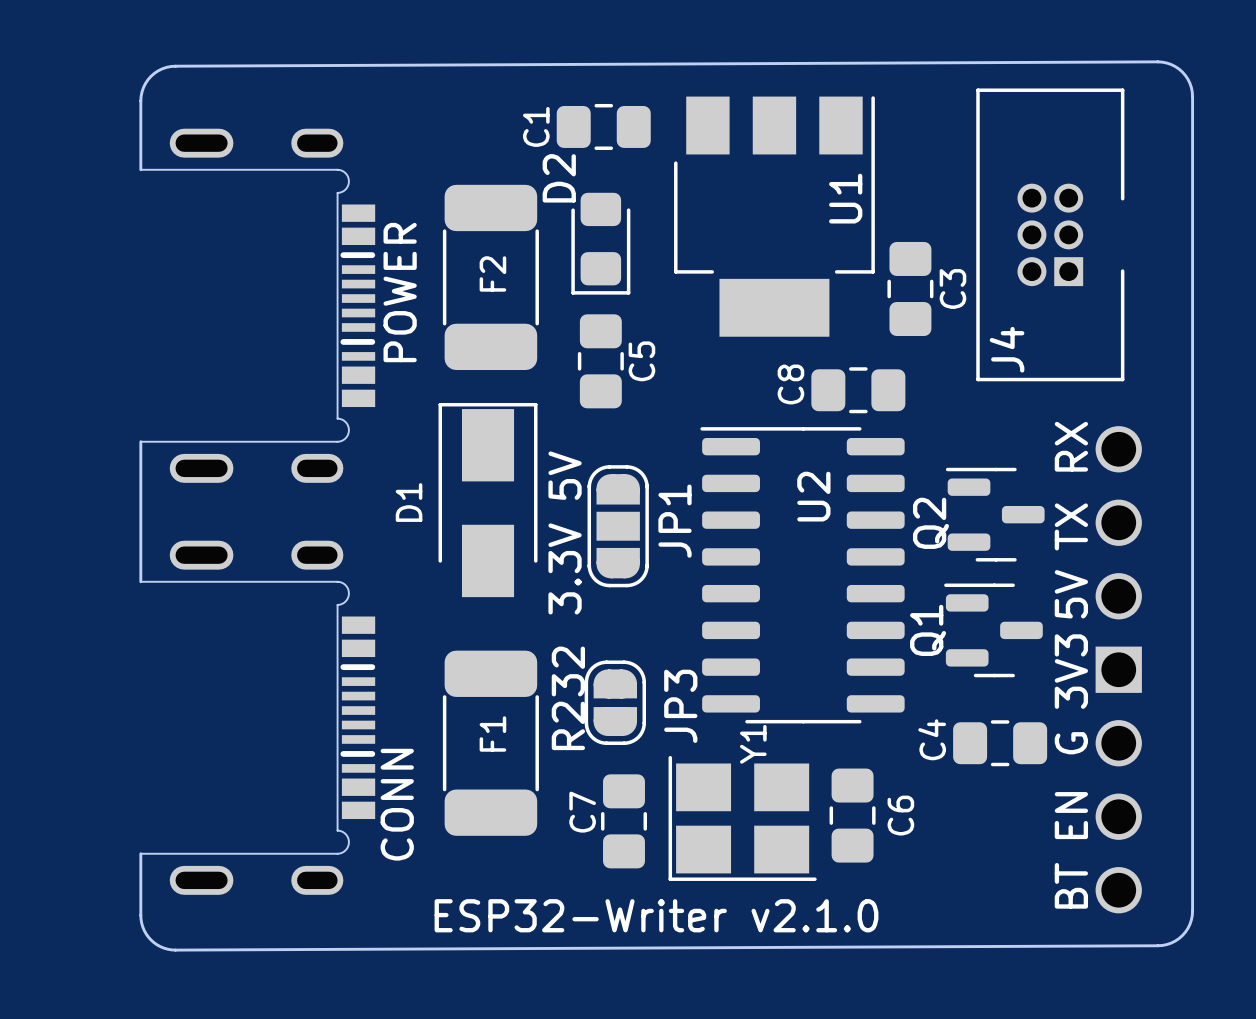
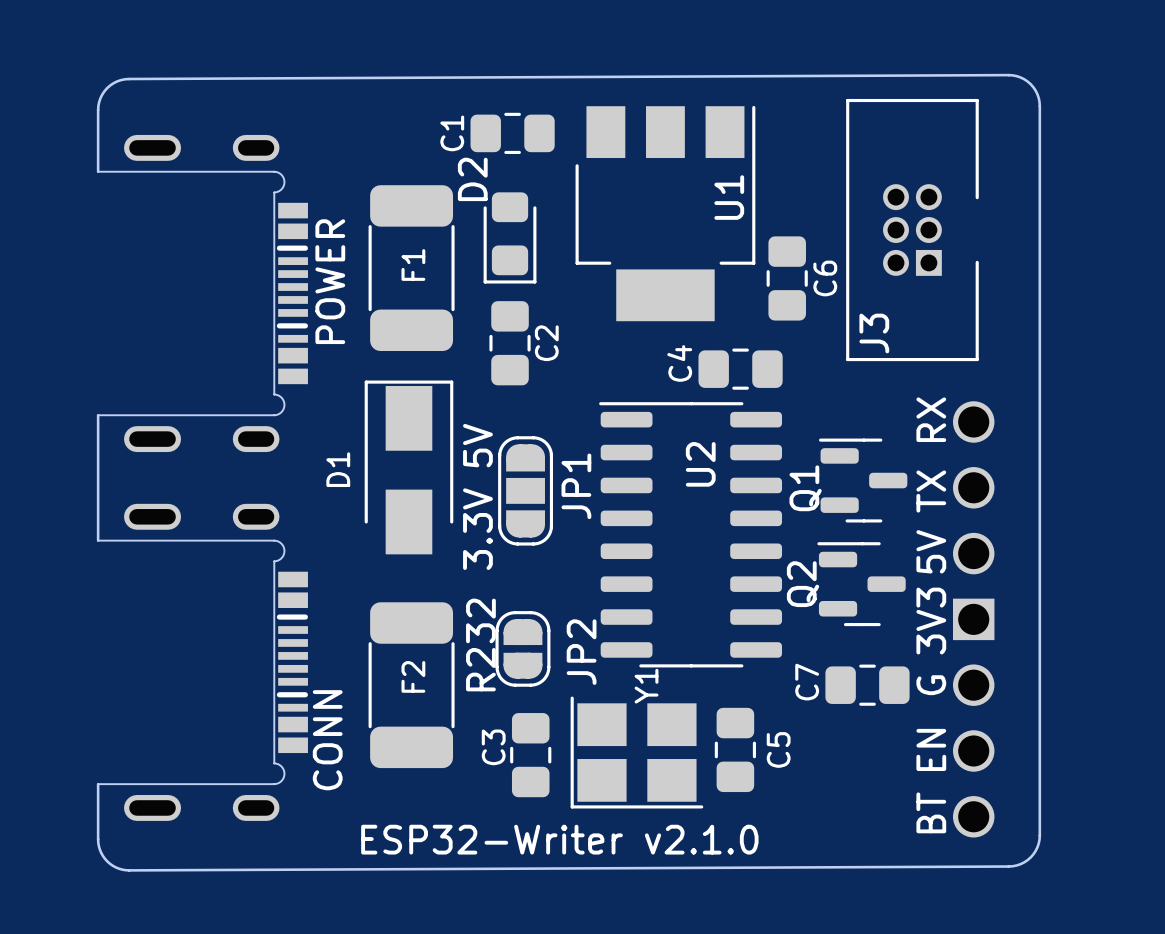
F2 name: F2 (492, 273) -> F1 (413, 265)
C3 name: C3 (952, 288) -> C6 (825, 278)
J4 name: J4 (1007, 349) -> J3 (874, 333)
C5 name: C5 (641, 361) -> C2 (546, 343)
C8 name: C8 (790, 384) -> C4 (679, 363)
Q2 name: Q2 (930, 523) -> Q1 (805, 488)
Q1 name: Q1 (928, 630) -> Q2 (803, 584)
JP3 name: JP3 (680, 706) -> JP2 (581, 652)
F1 name: F1 (492, 734) -> F2 (413, 676)
C4 name: C4 (932, 739) -> C7 (807, 682)
C7 name: C7 (582, 812) -> C3 (493, 747)
C6 name: C6 (900, 815) -> C5 (778, 749)

